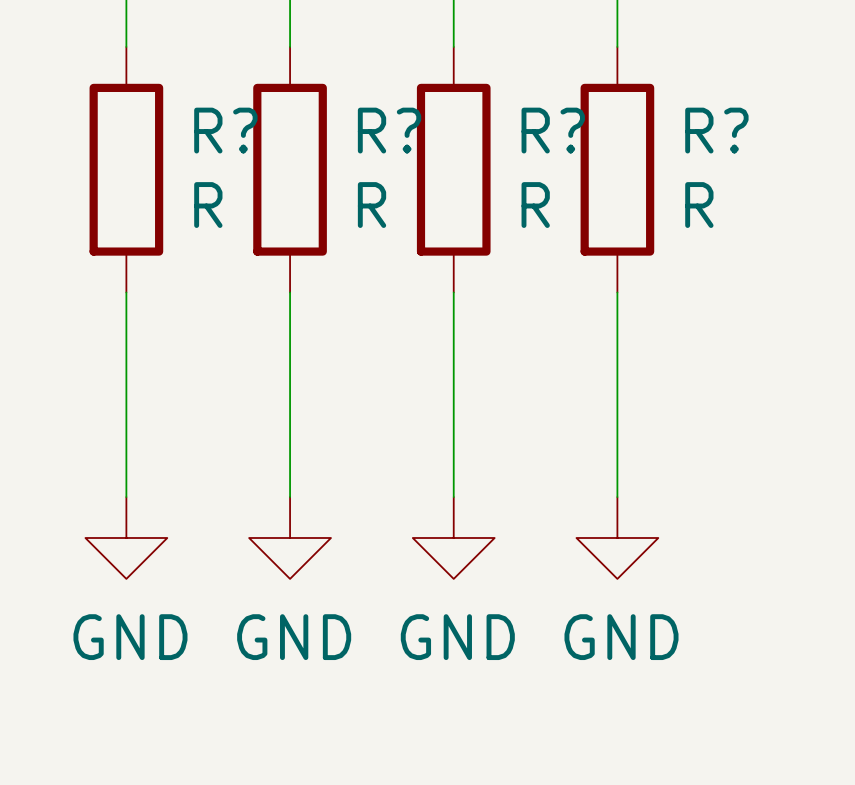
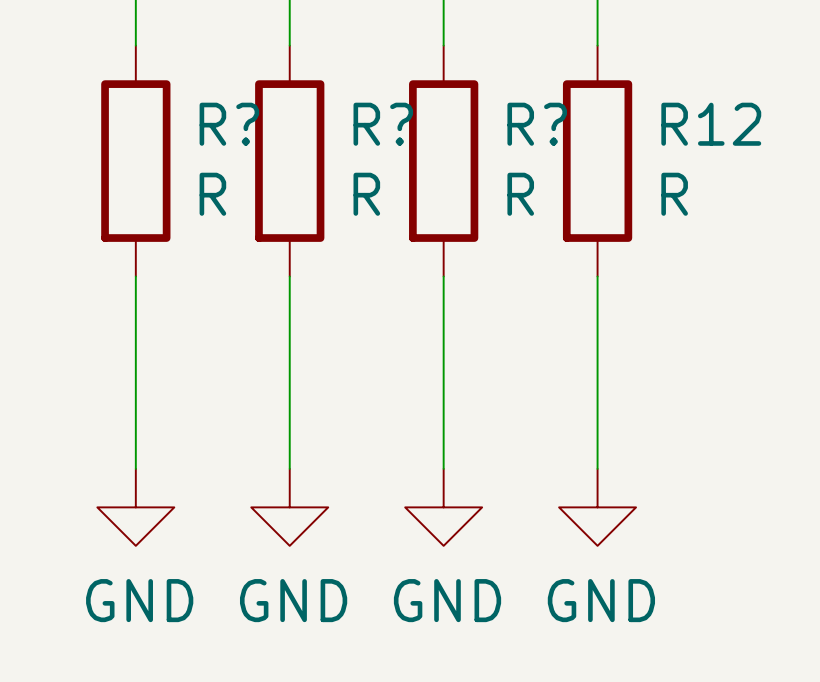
R? name: R? (716, 130) -> R12 (711, 124)

